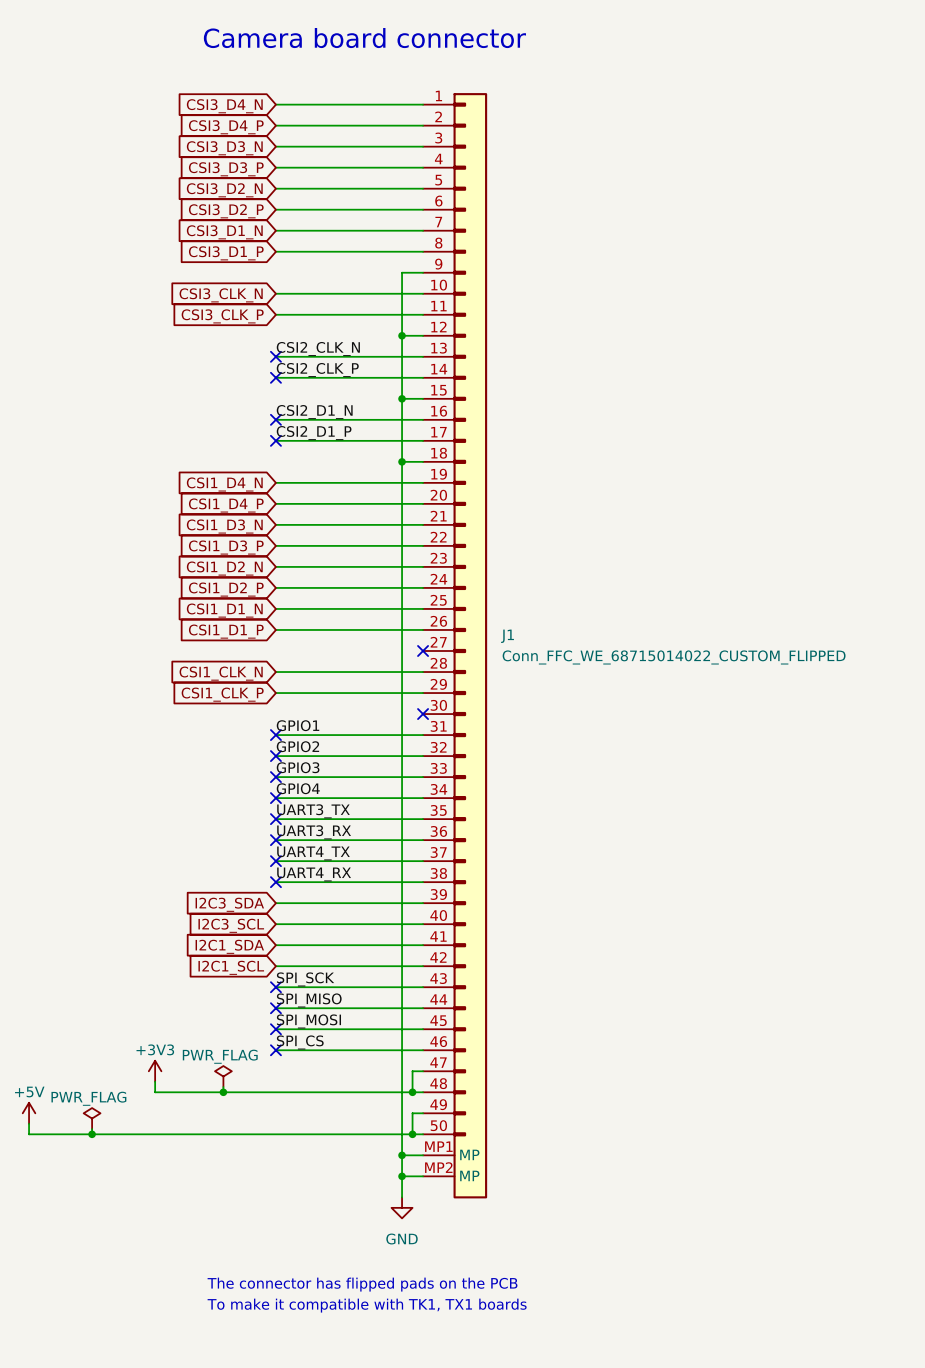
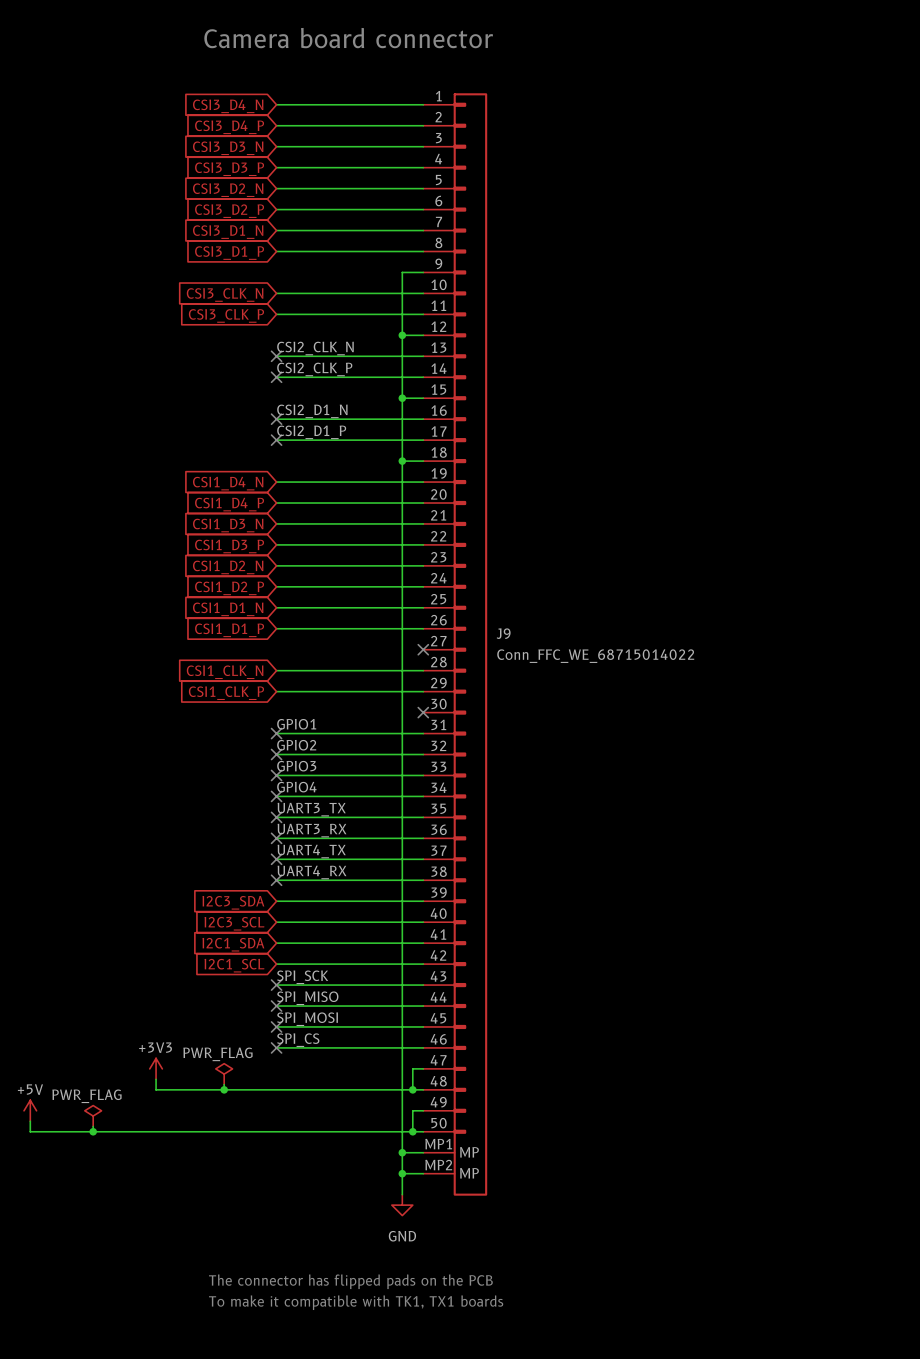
J1 name: J1 (507, 636) -> J9 (503, 633)
J1 value: Conn_FFC_WE_68715014022_CUSTOM_FLIPPED (674, 657) -> Conn_FFC_WE_68715014022 (595, 656)

